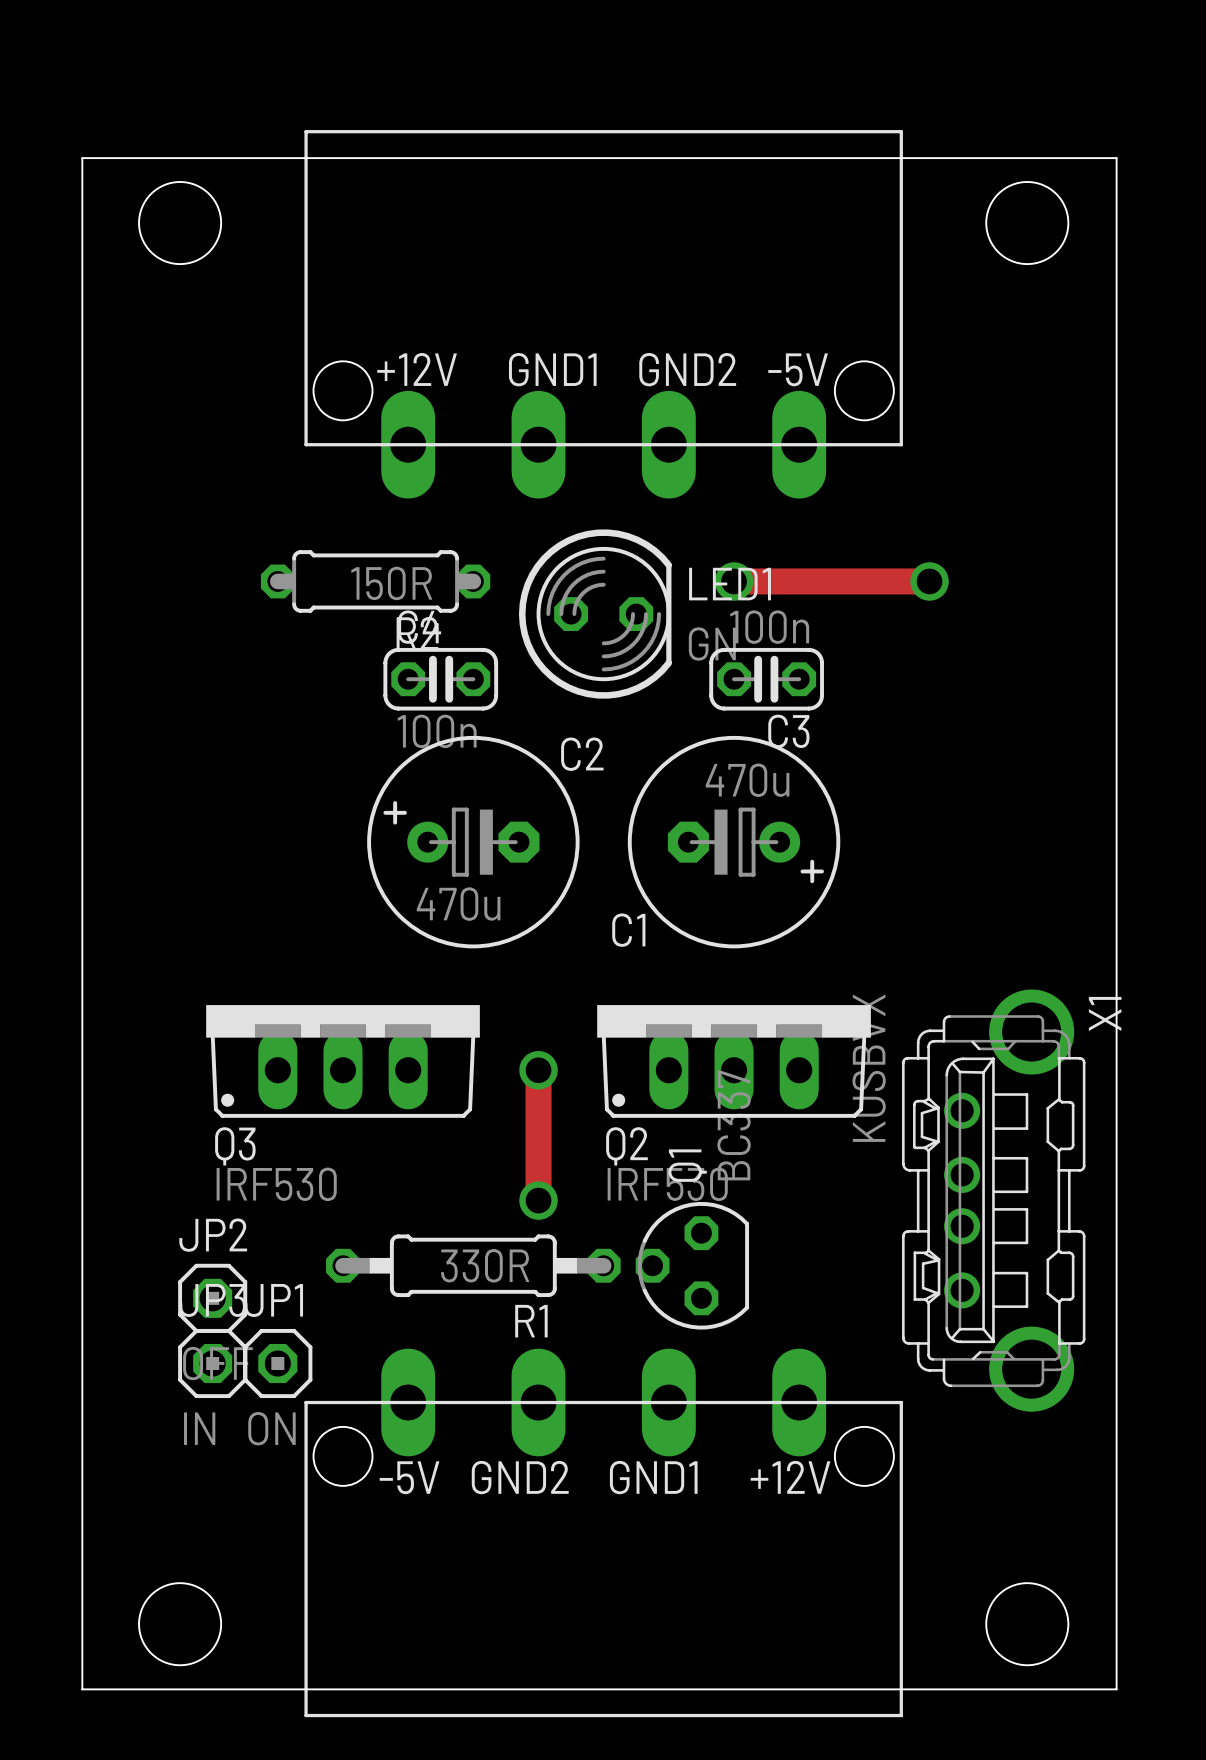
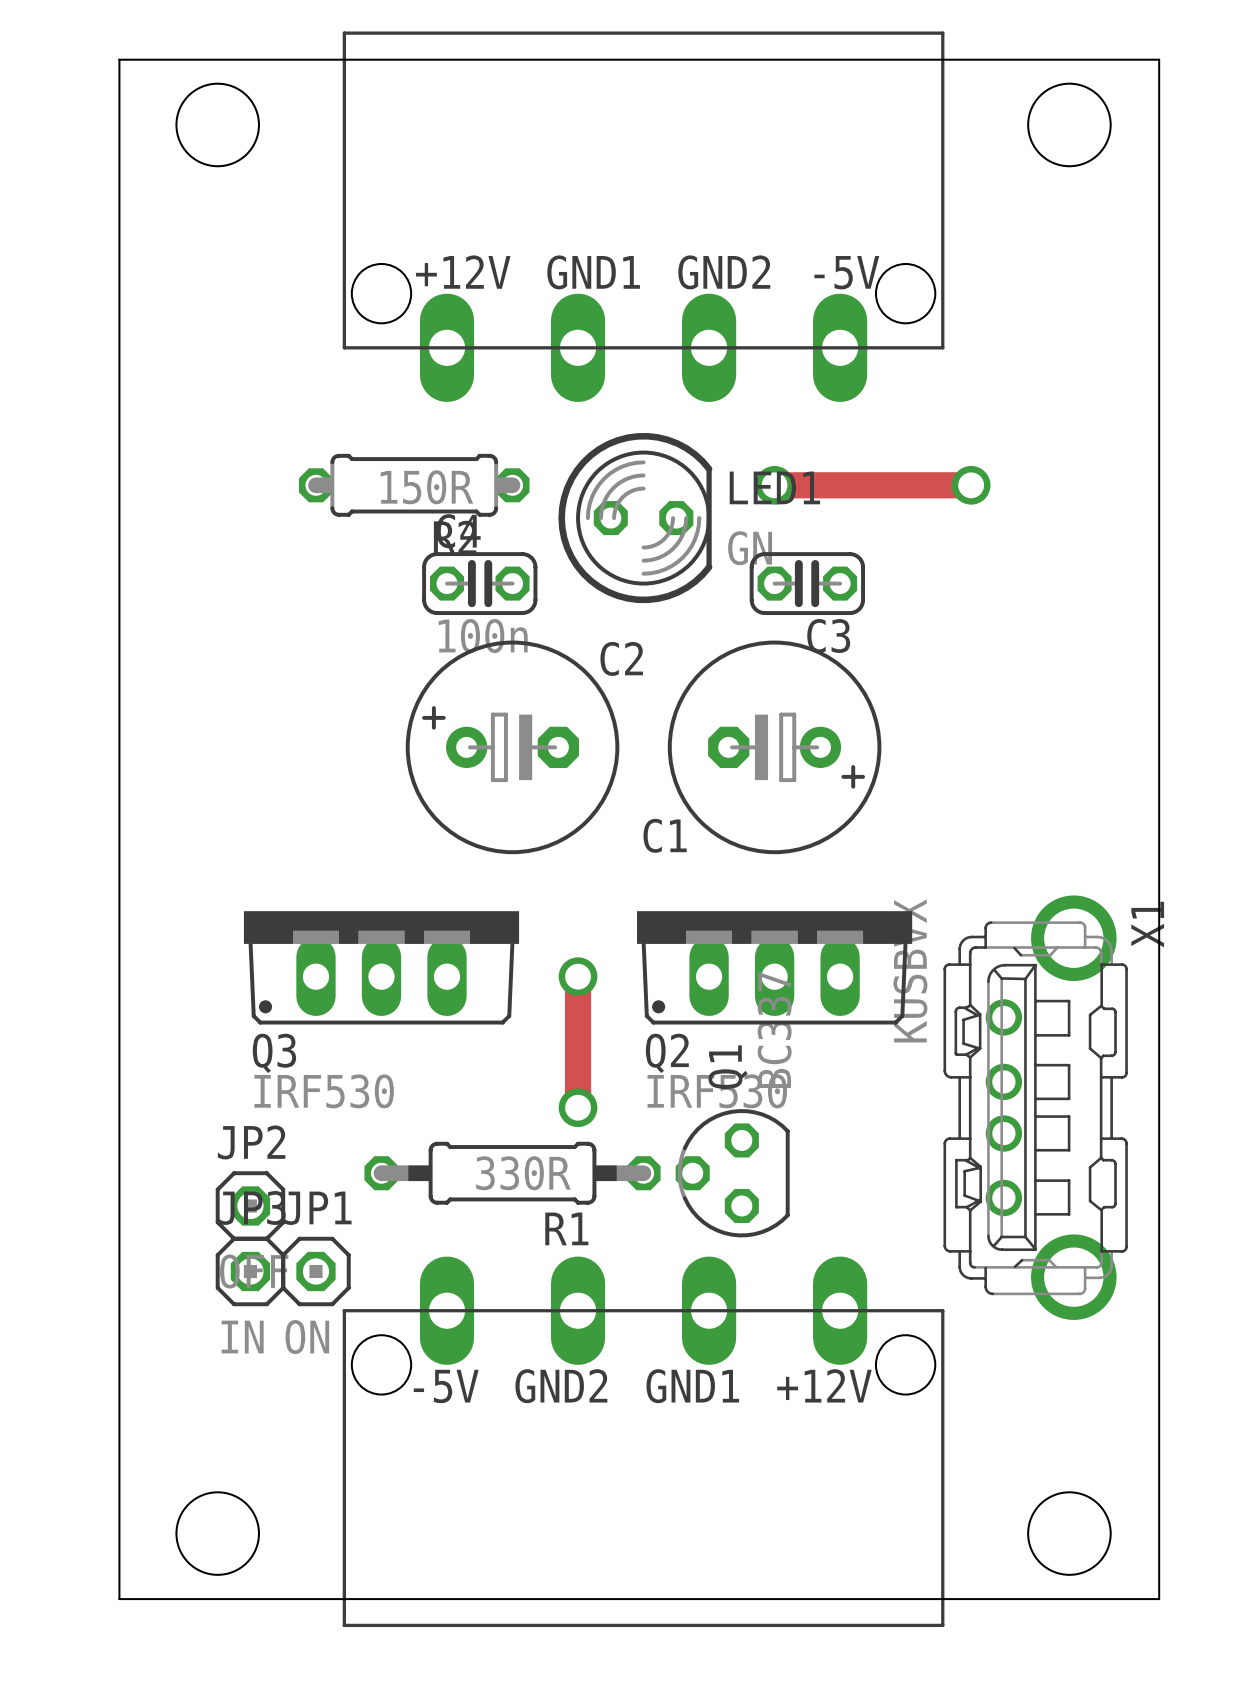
C3 value: 100n (769, 627) -> none
C1 value: 470u (747, 780) -> none
C2 value: 470u (458, 904) -> none

